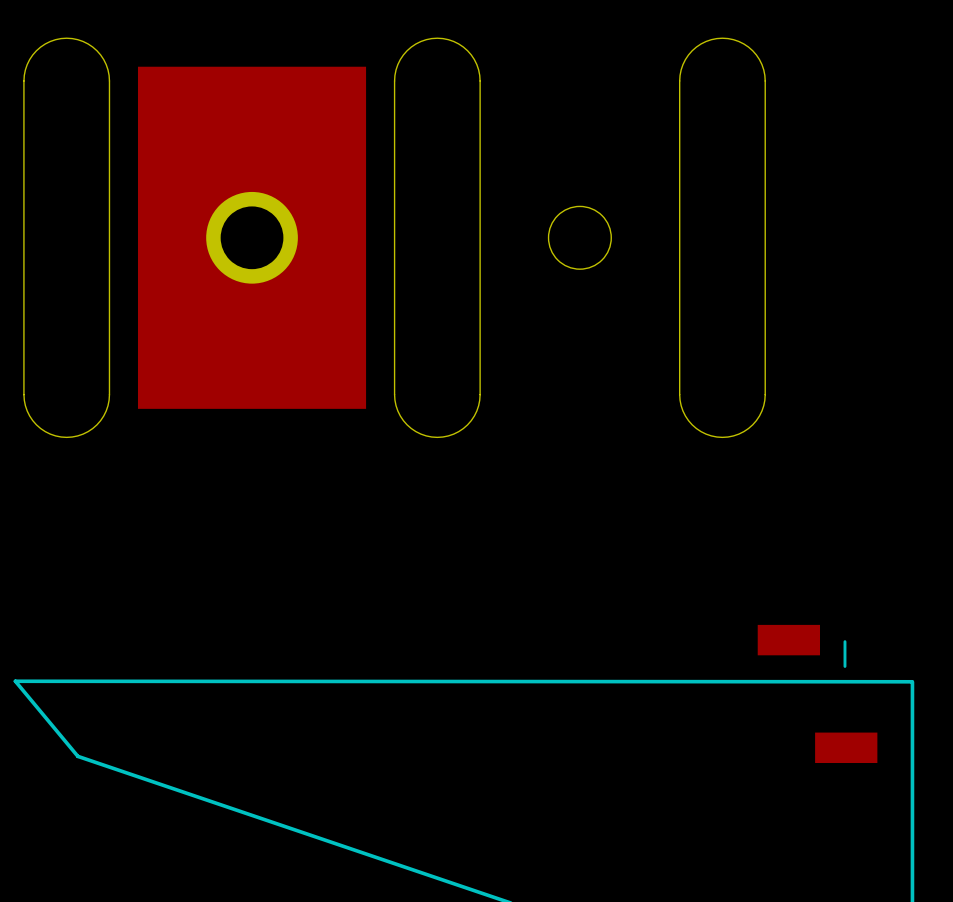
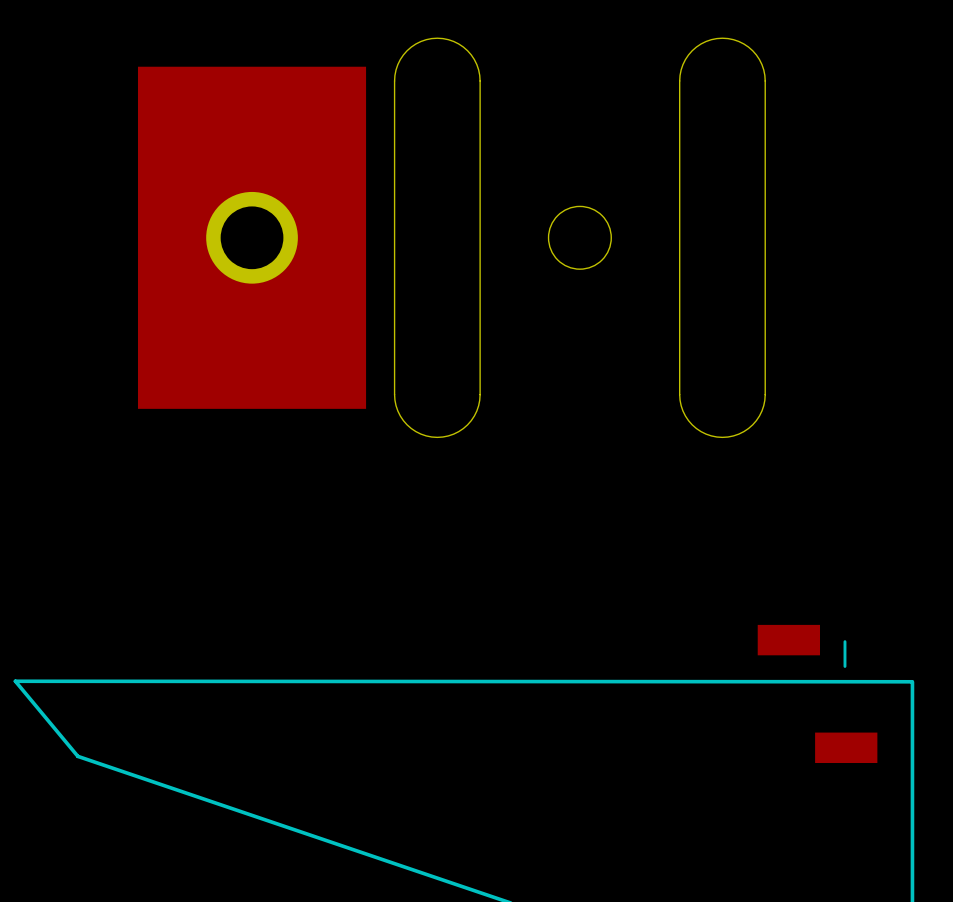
board edge: (23, 80) (24, 400) (29, 415) (40, 428) (55, 435) (72, 437) (83, 434) (96, 424) (106, 410) (109, 400) (109, 75) (103, 59) (92, 47) (77, 39) (61, 38) (50, 41) (36, 50) (27, 64) (23, 80) -> none

